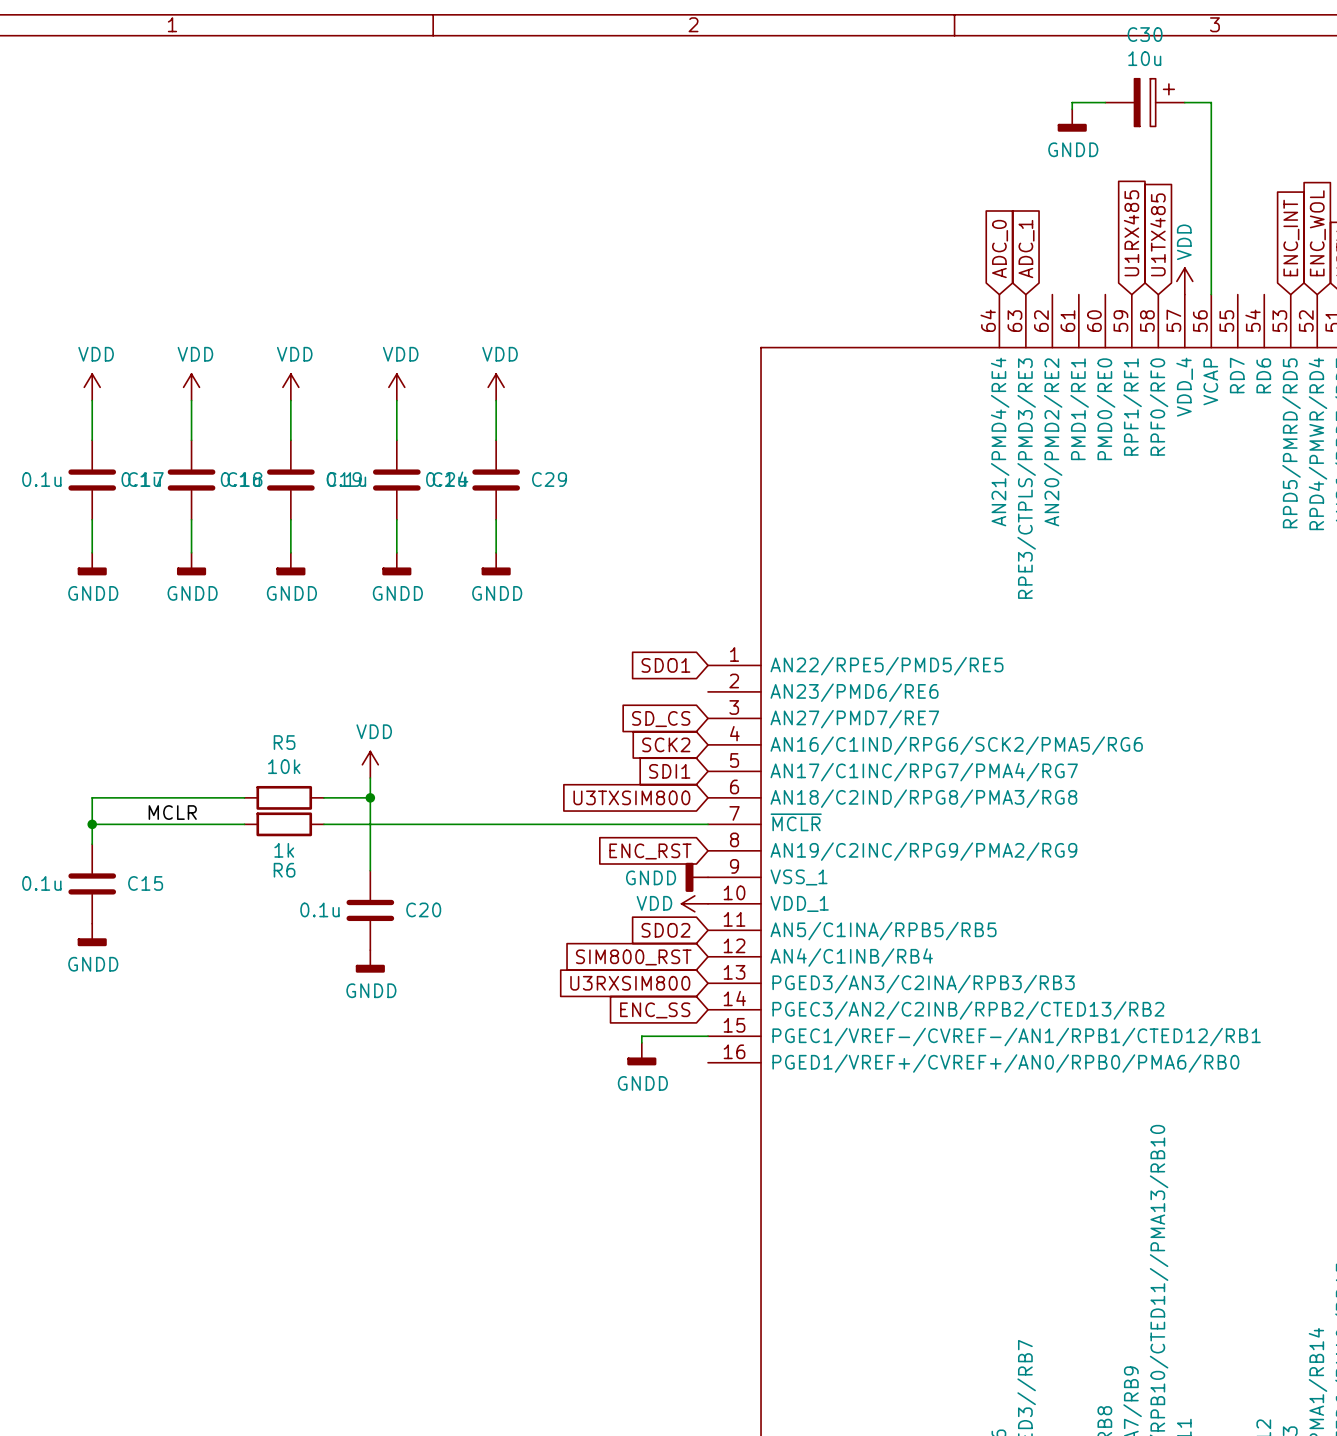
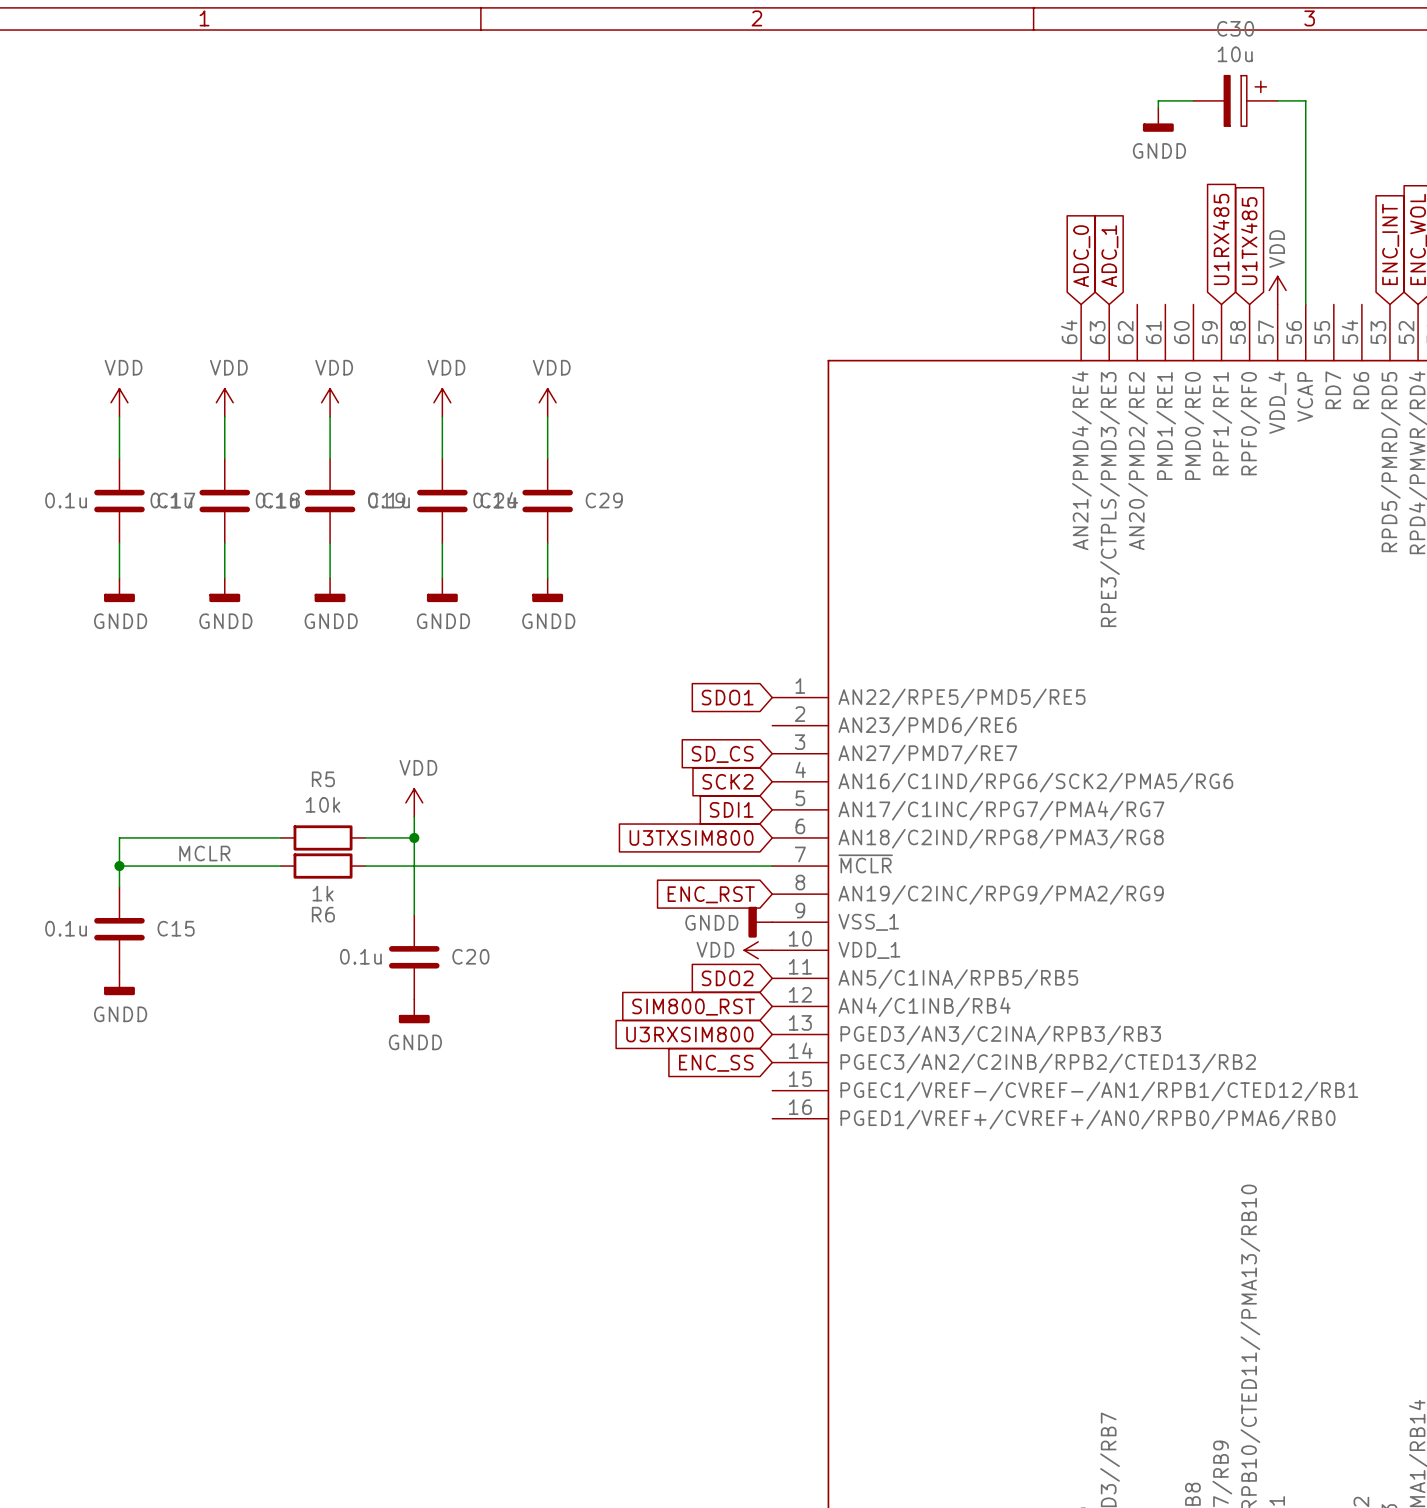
wire: (708, 1036) (641, 1036) (641, 1042) -> none
power symbol: GNDD (641, 1054) -> none

